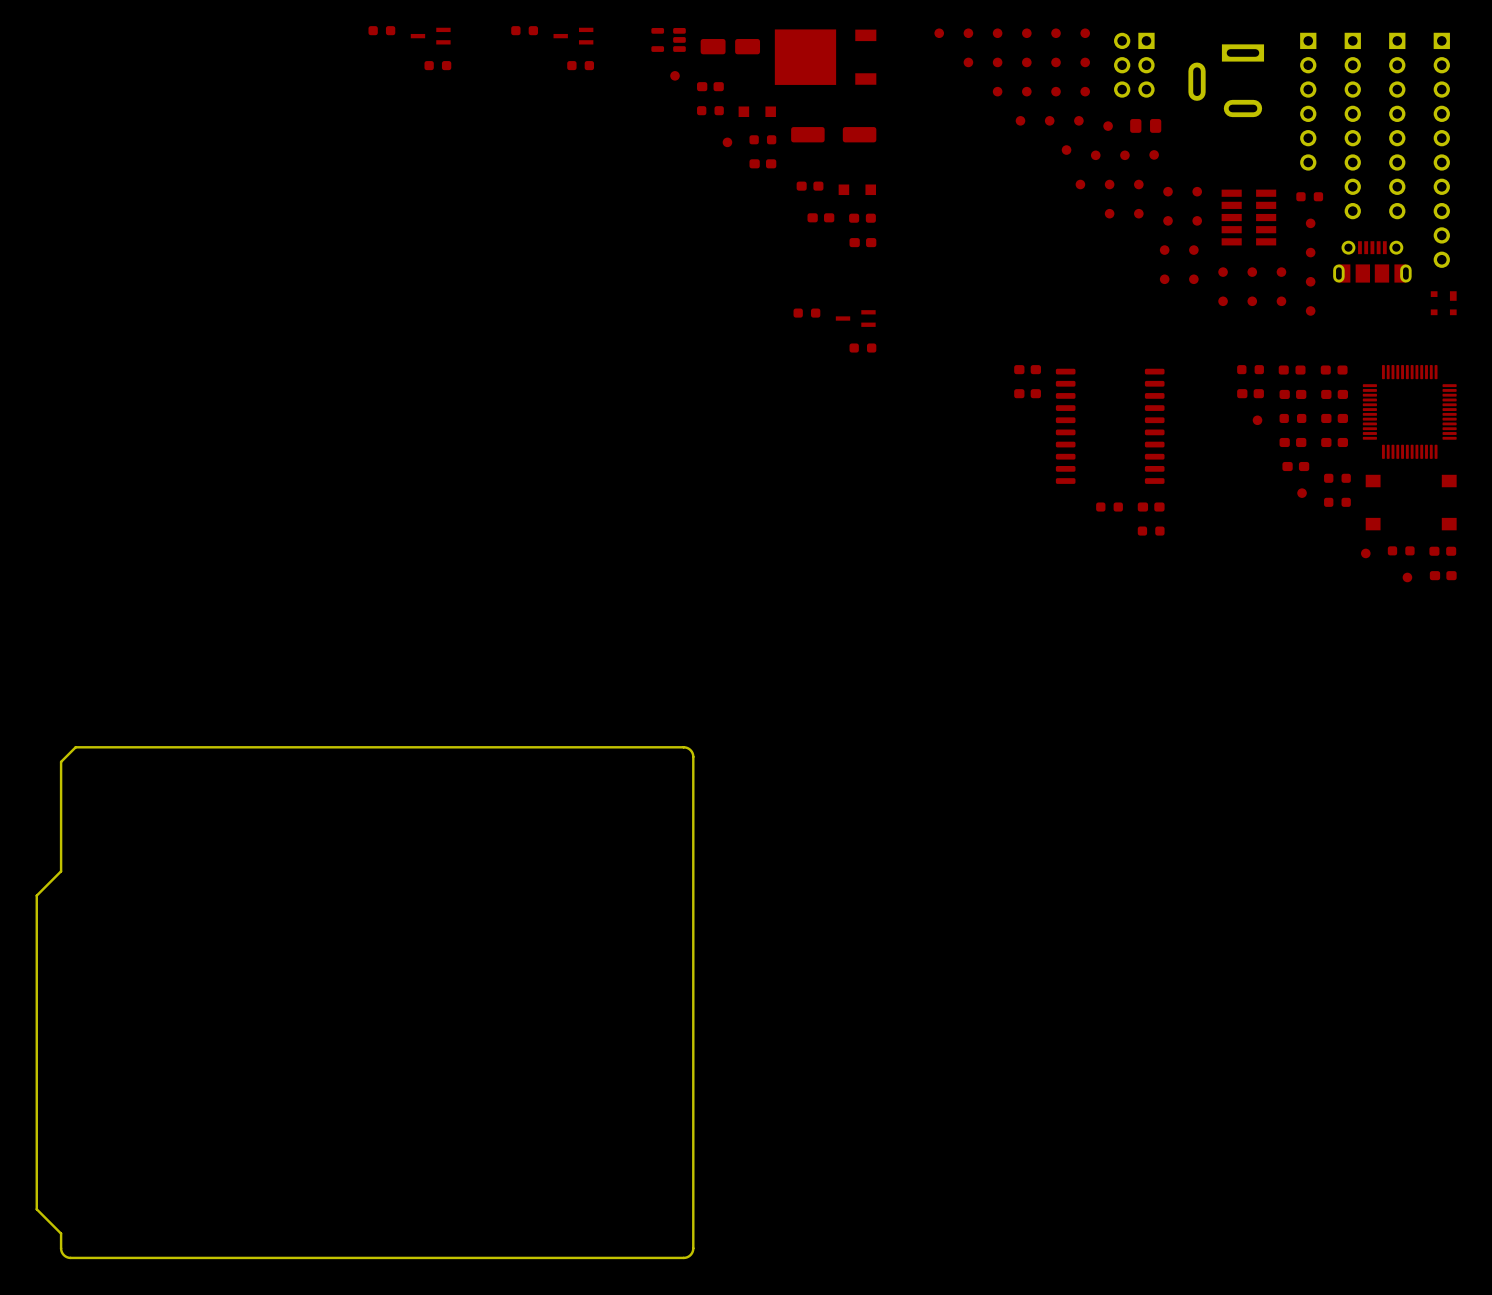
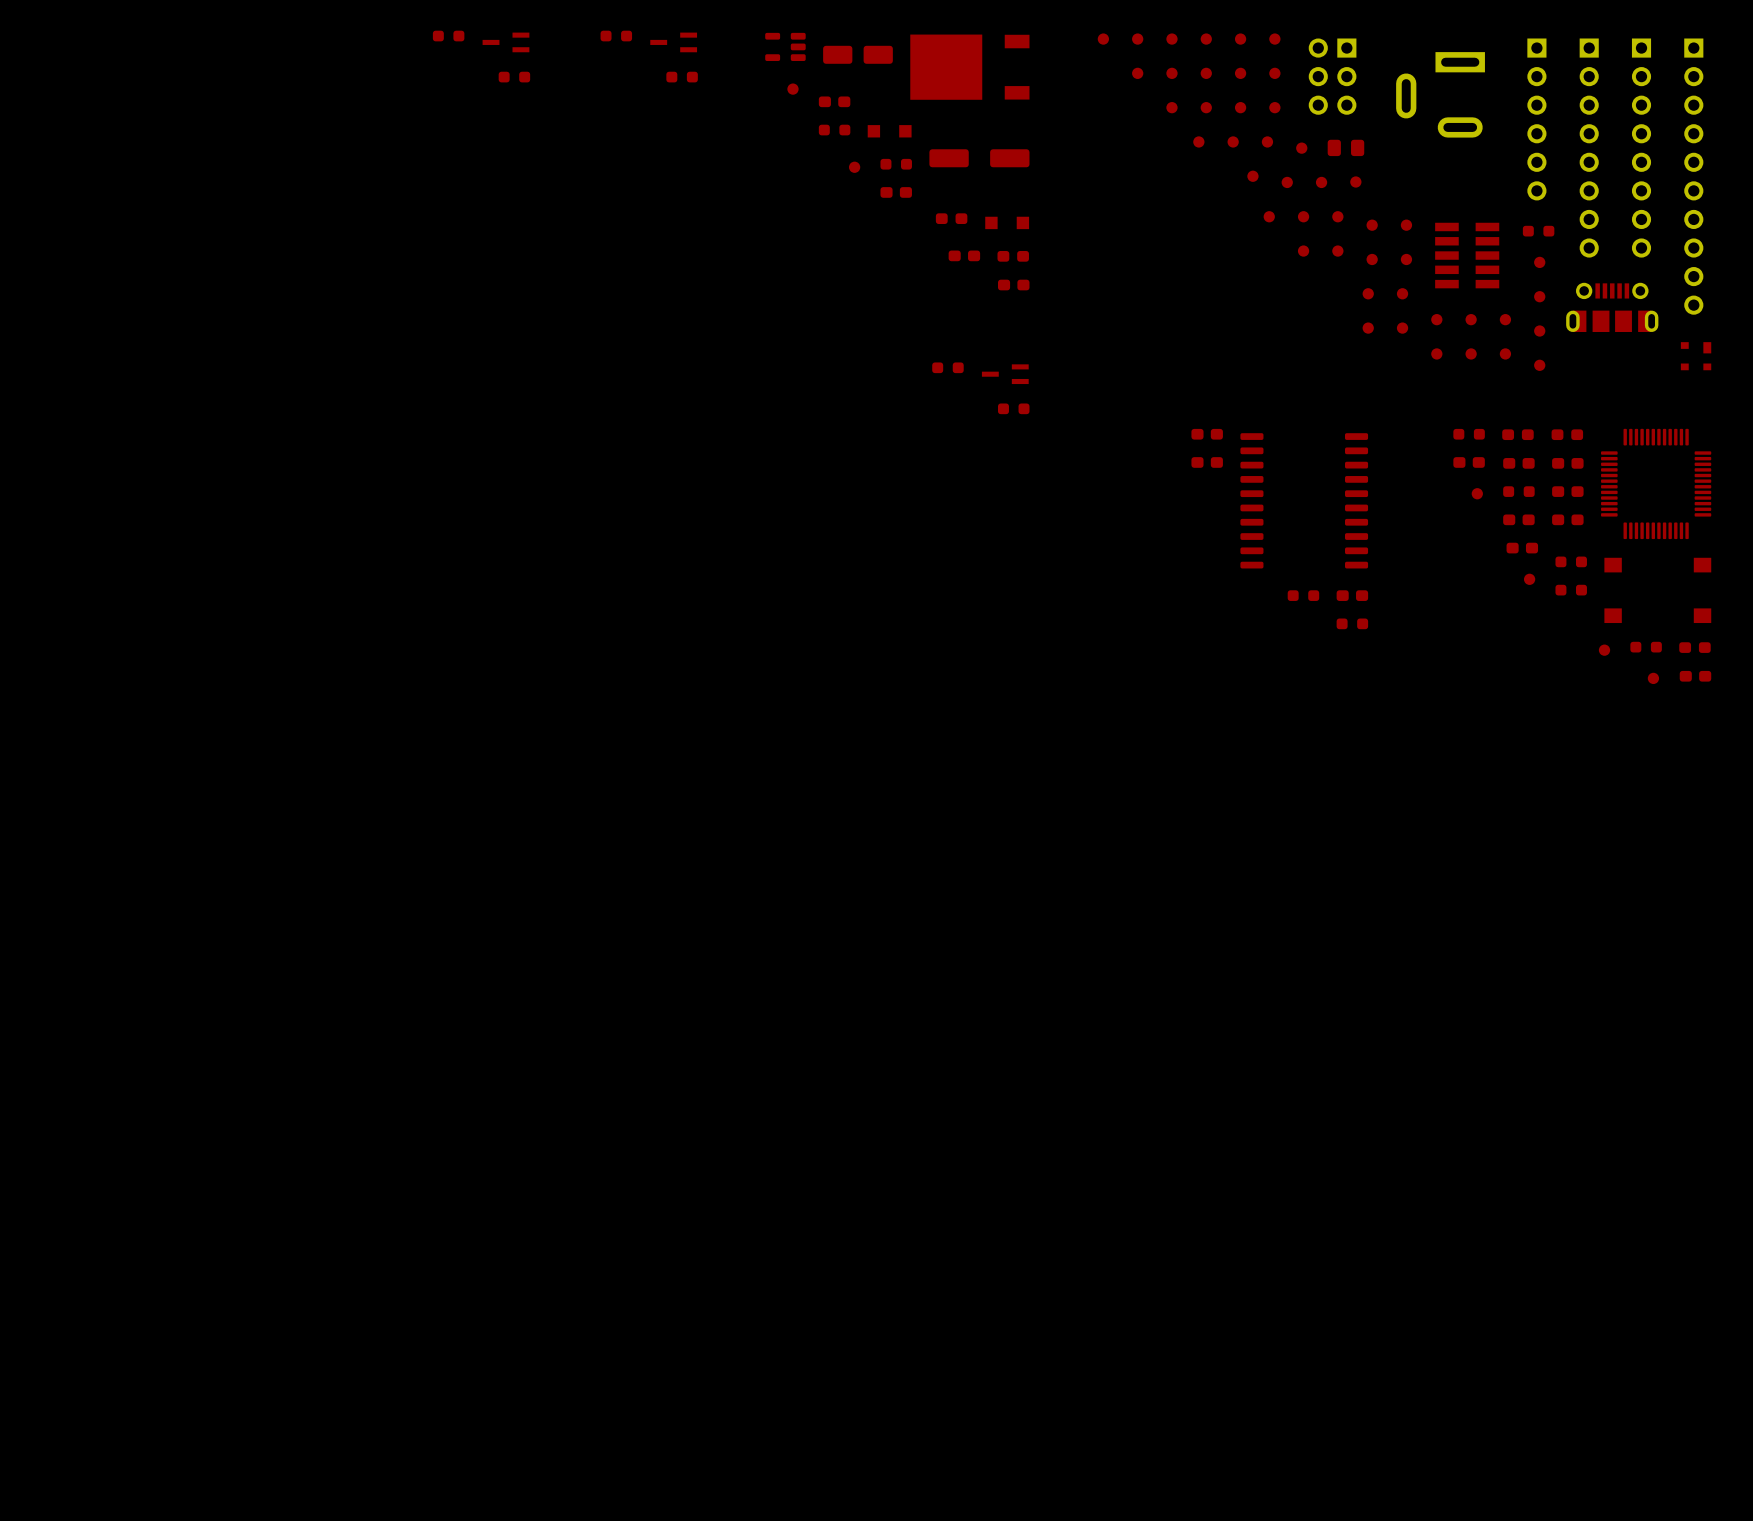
board edge: (683, 747) (75, 747) (61, 761) (61, 871) (36, 895) (36, 1209) (61, 1233) (61, 1249) (63, 1254) (70, 1257) (683, 1257) (689, 1255) (693, 1248) (693, 756) (690, 750) (683, 747) -> none

